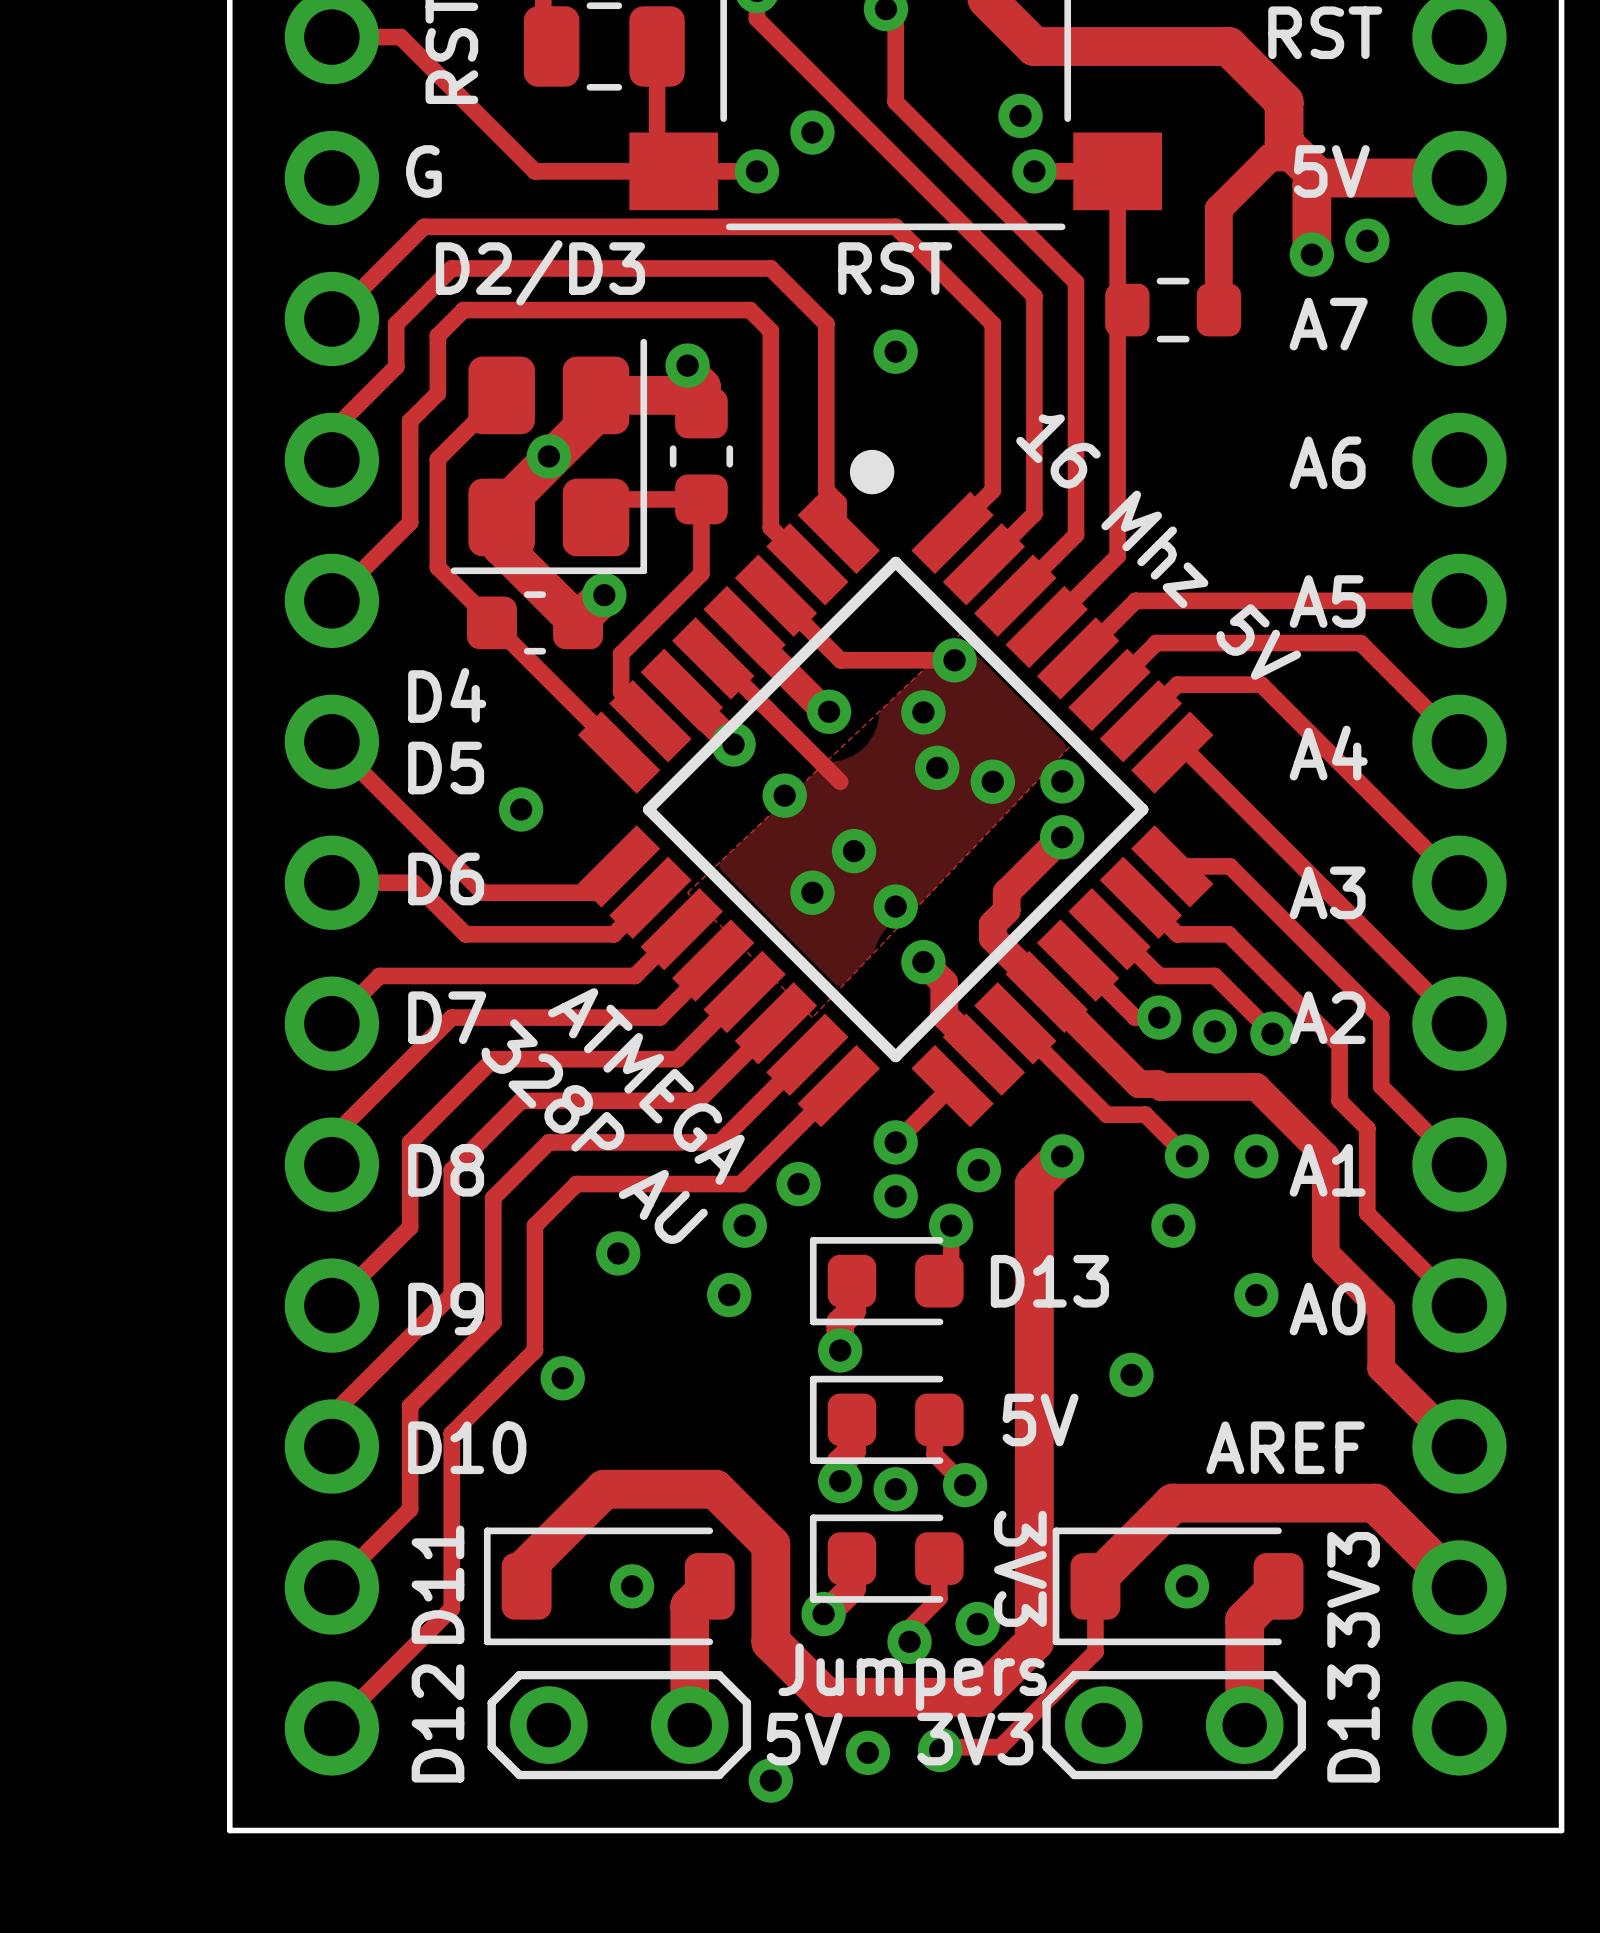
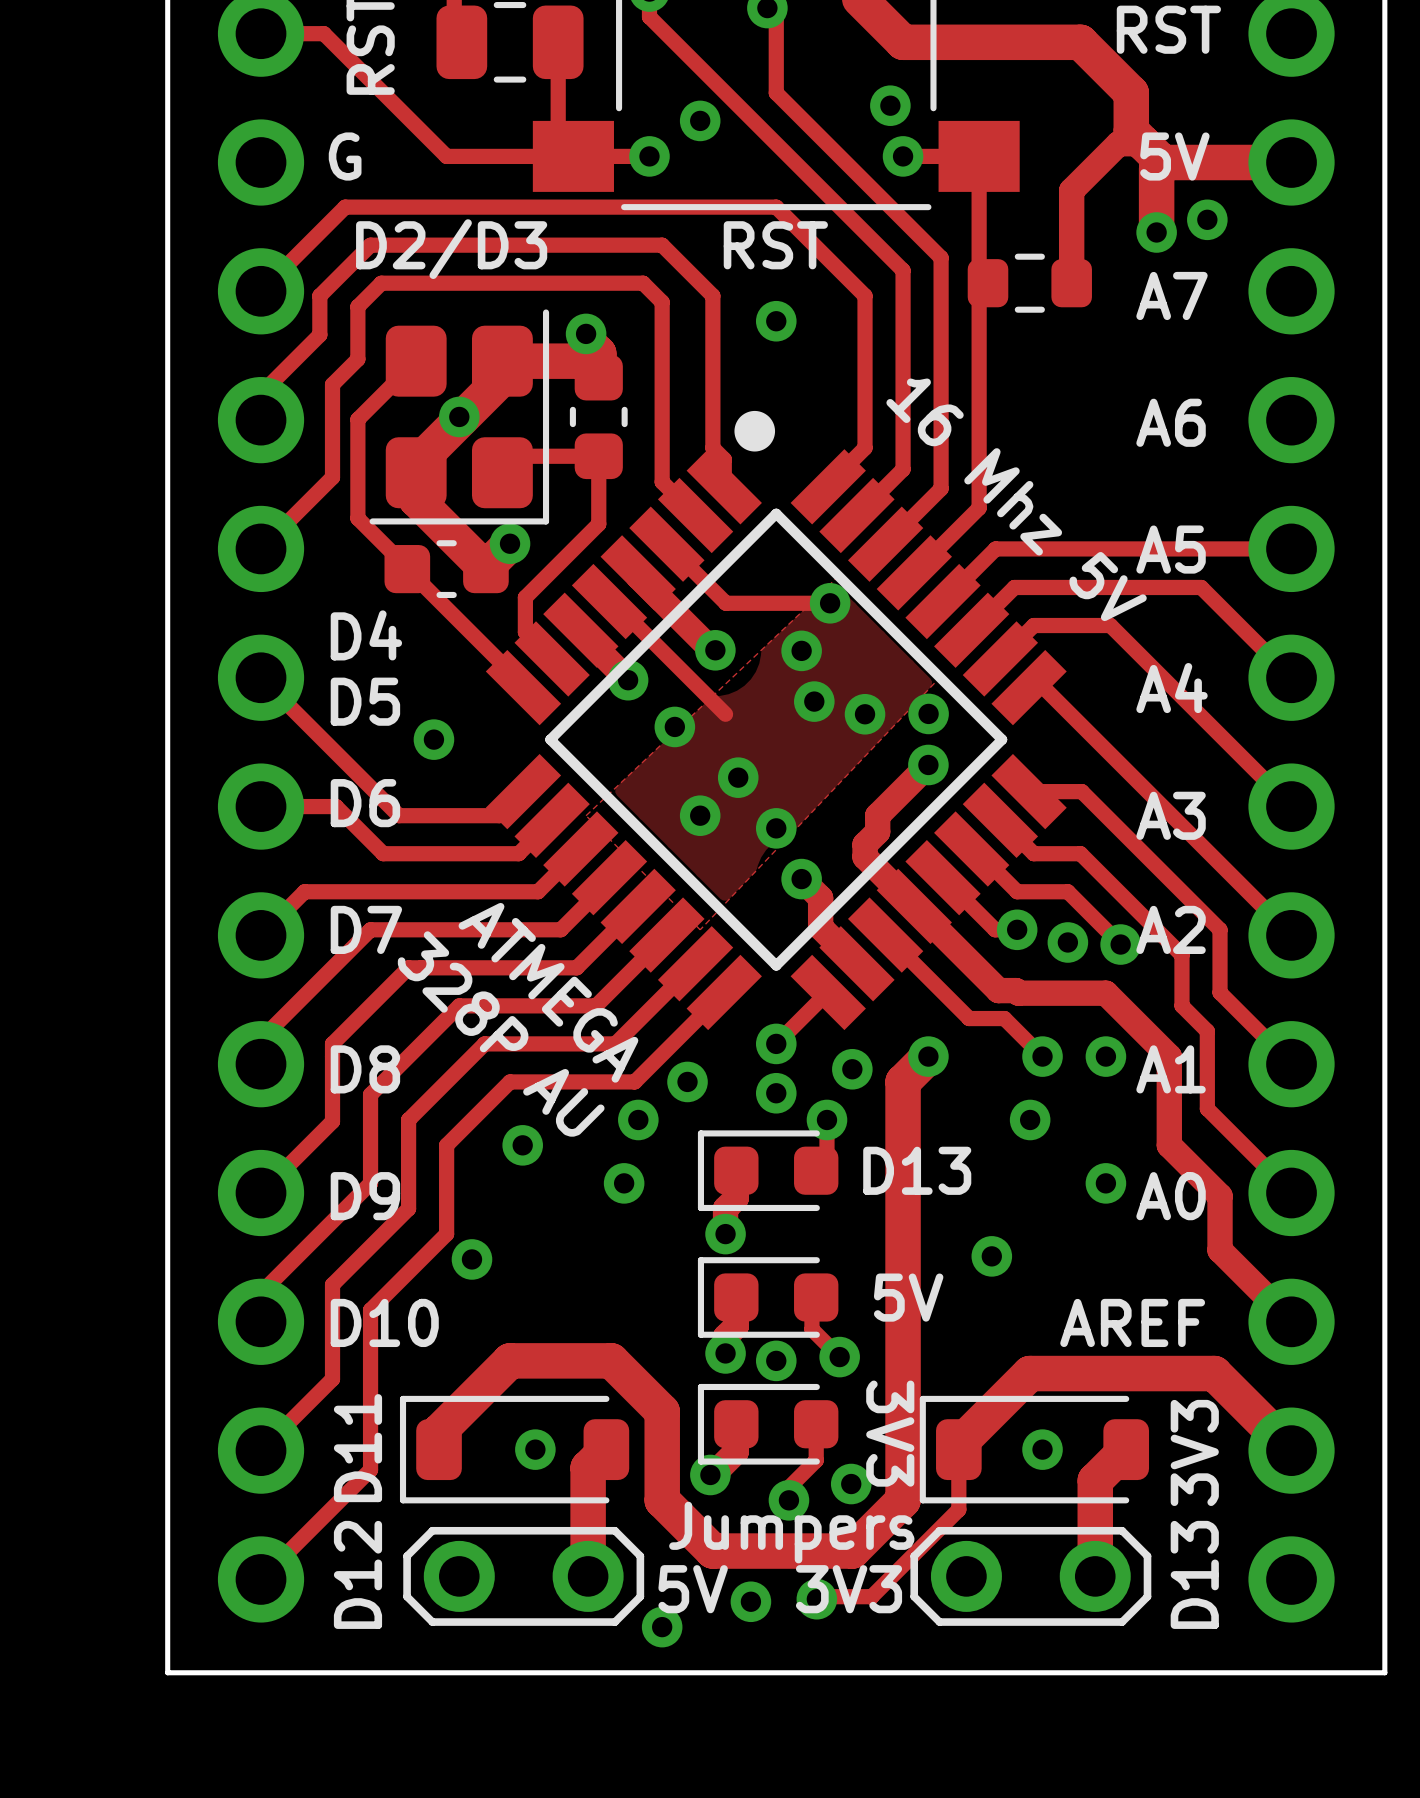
track: (548, 1100) (521, 1100) (451, 1170) (451, 1197) -> (459, 1005) (370, 1094)
track: (576, 1142) (548, 1142) (493, 1197) (493, 1225) -> (484, 1043) (408, 1119)
track: (604, 1184) (576, 1184) (534, 1225) (534, 1253) -> (510, 1081) (446, 1145)

